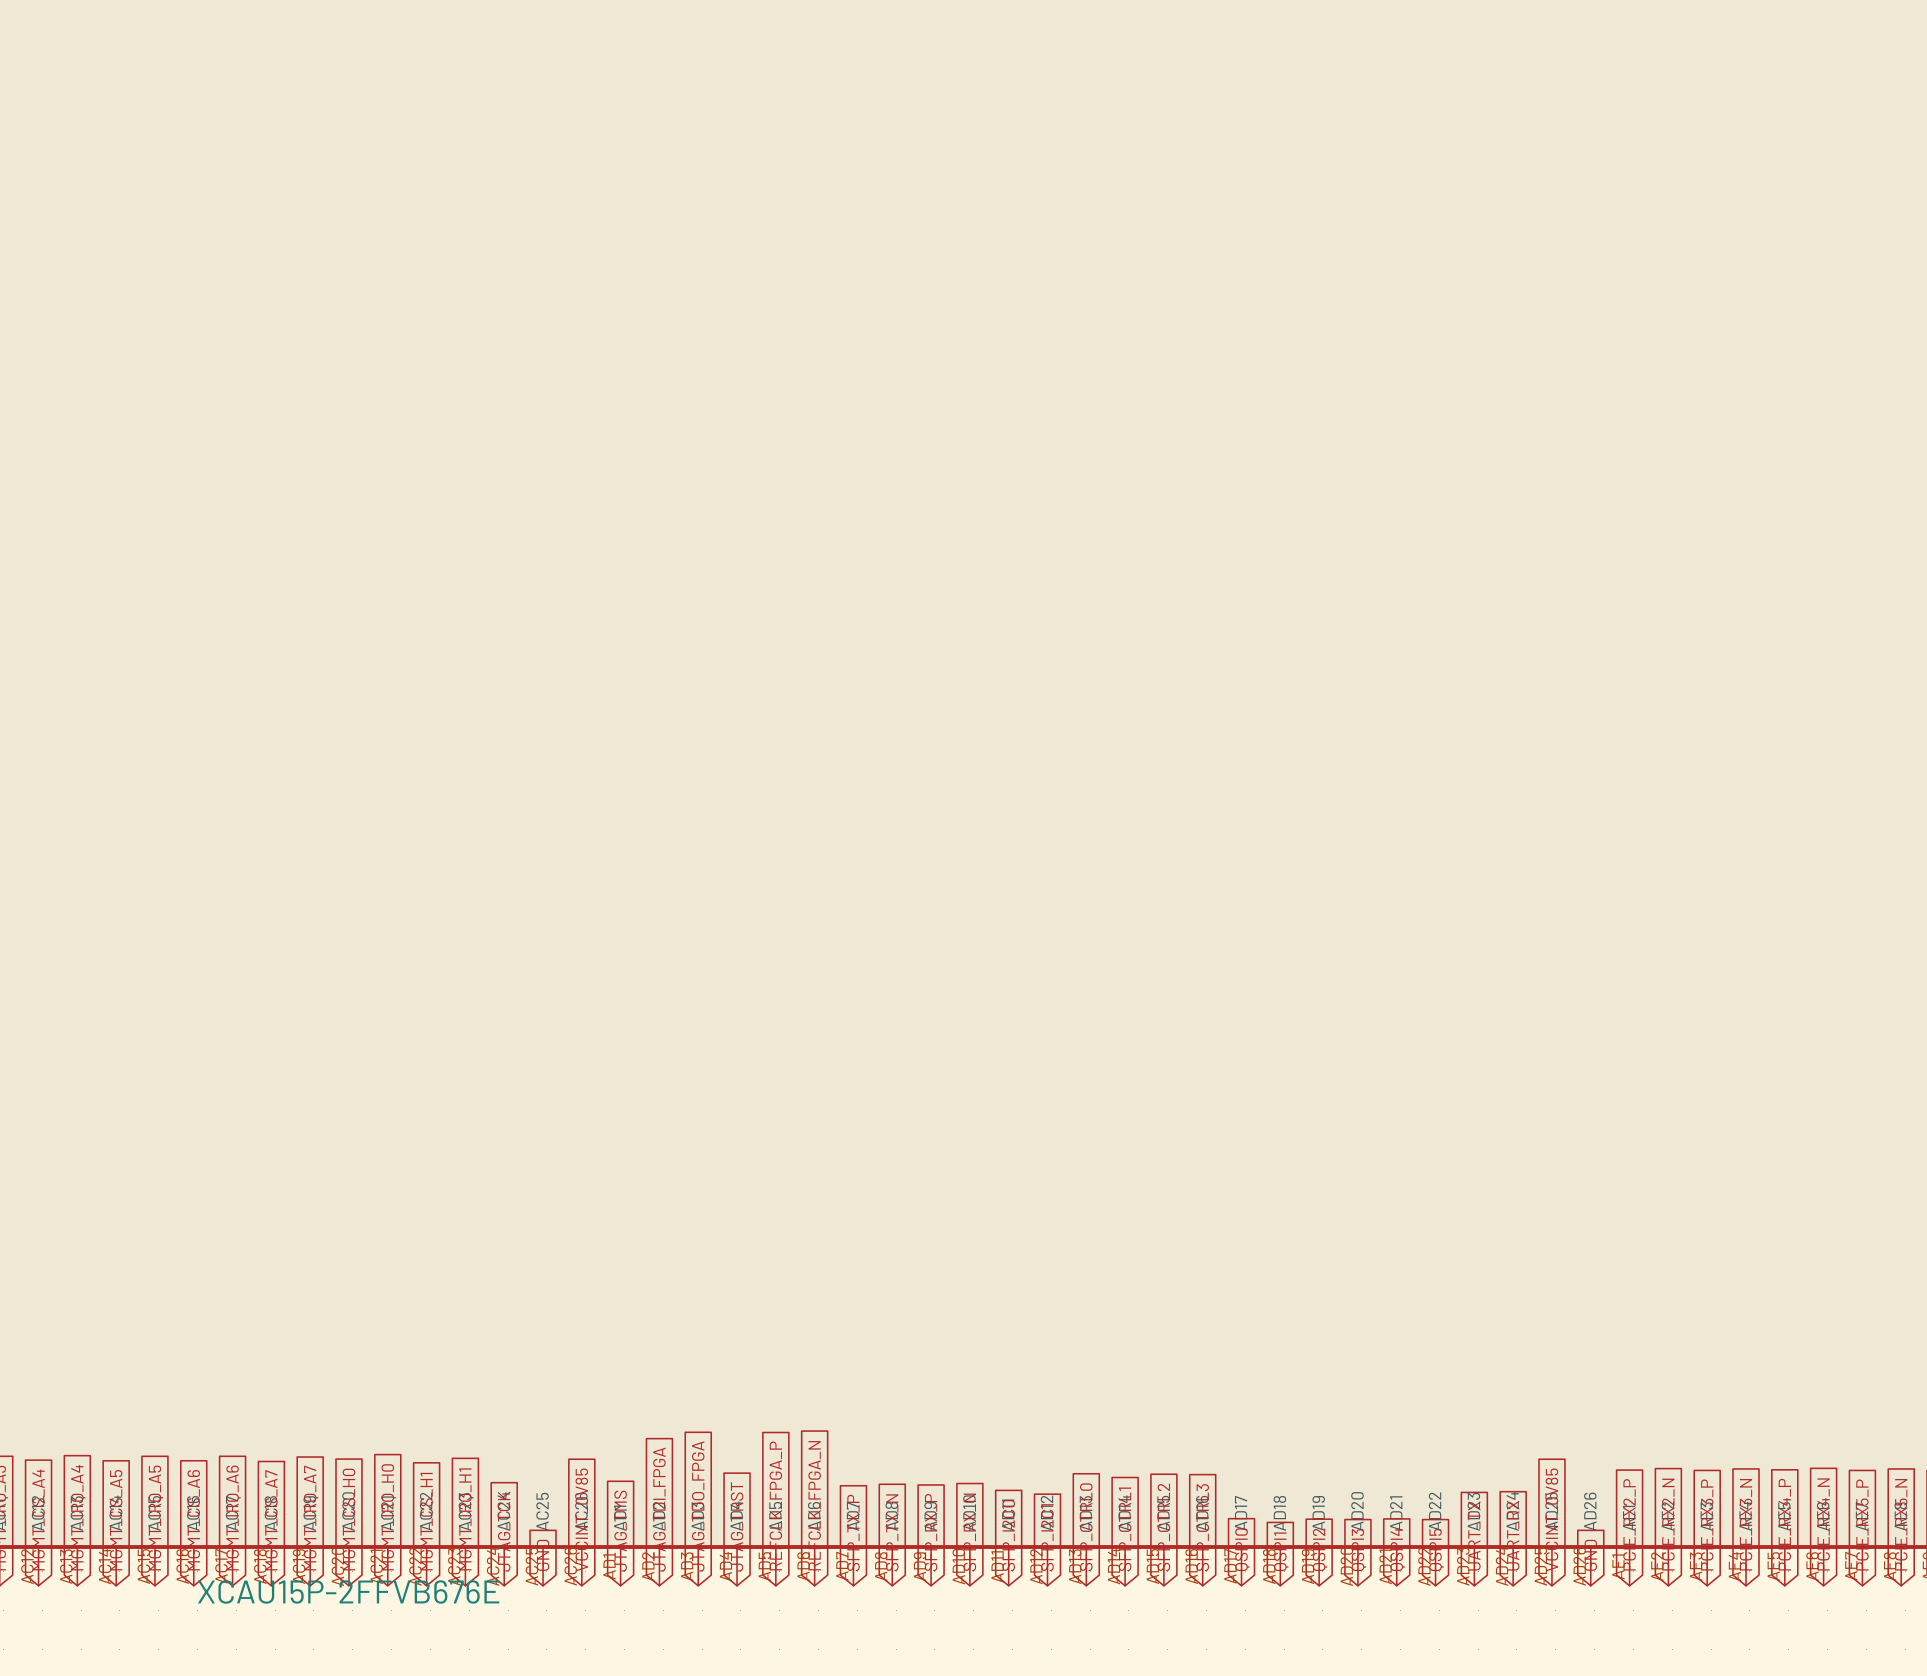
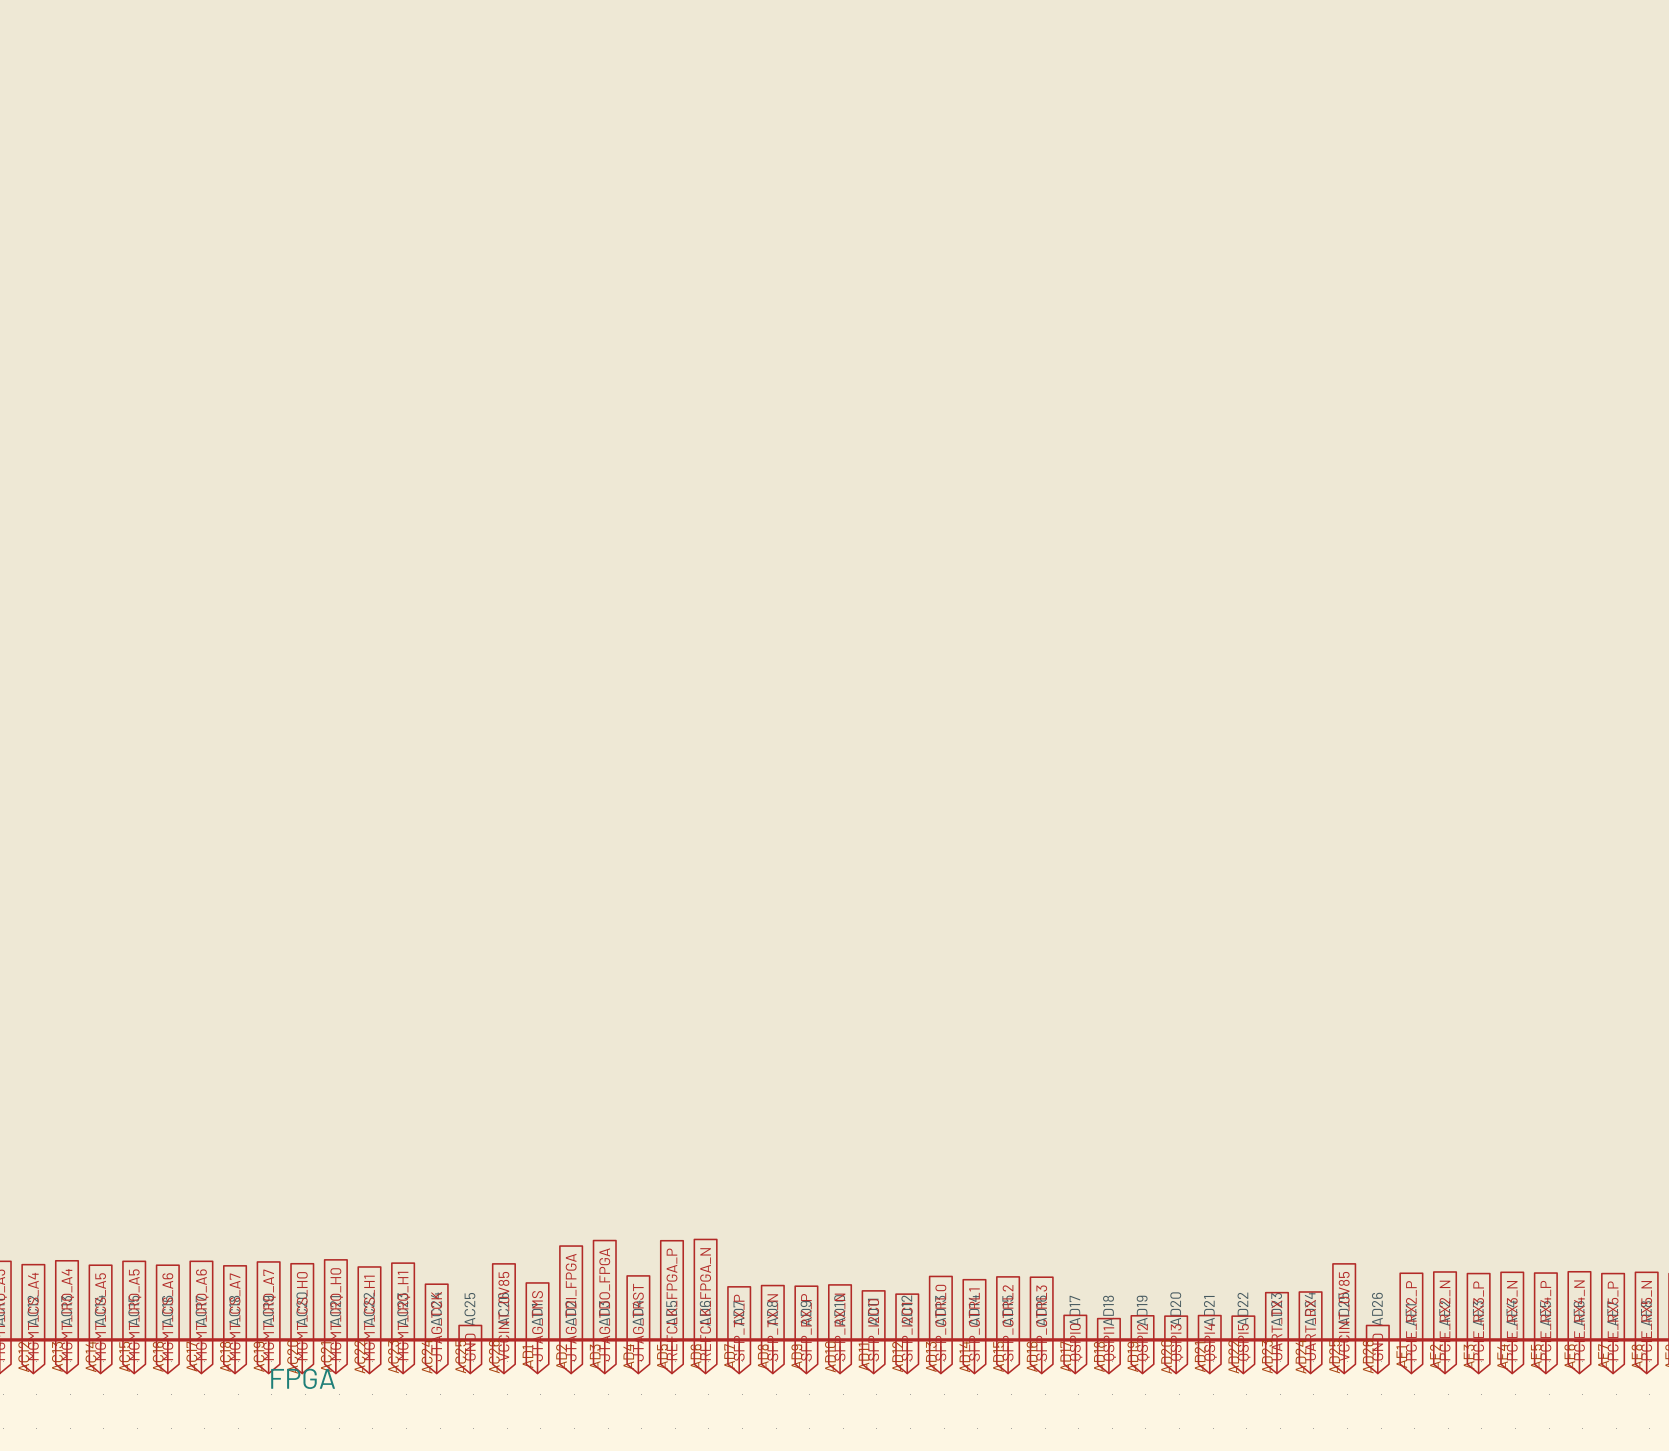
part value: XCAU15P-2FFVB676E (348, 1592) -> FPGA (303, 1378)

